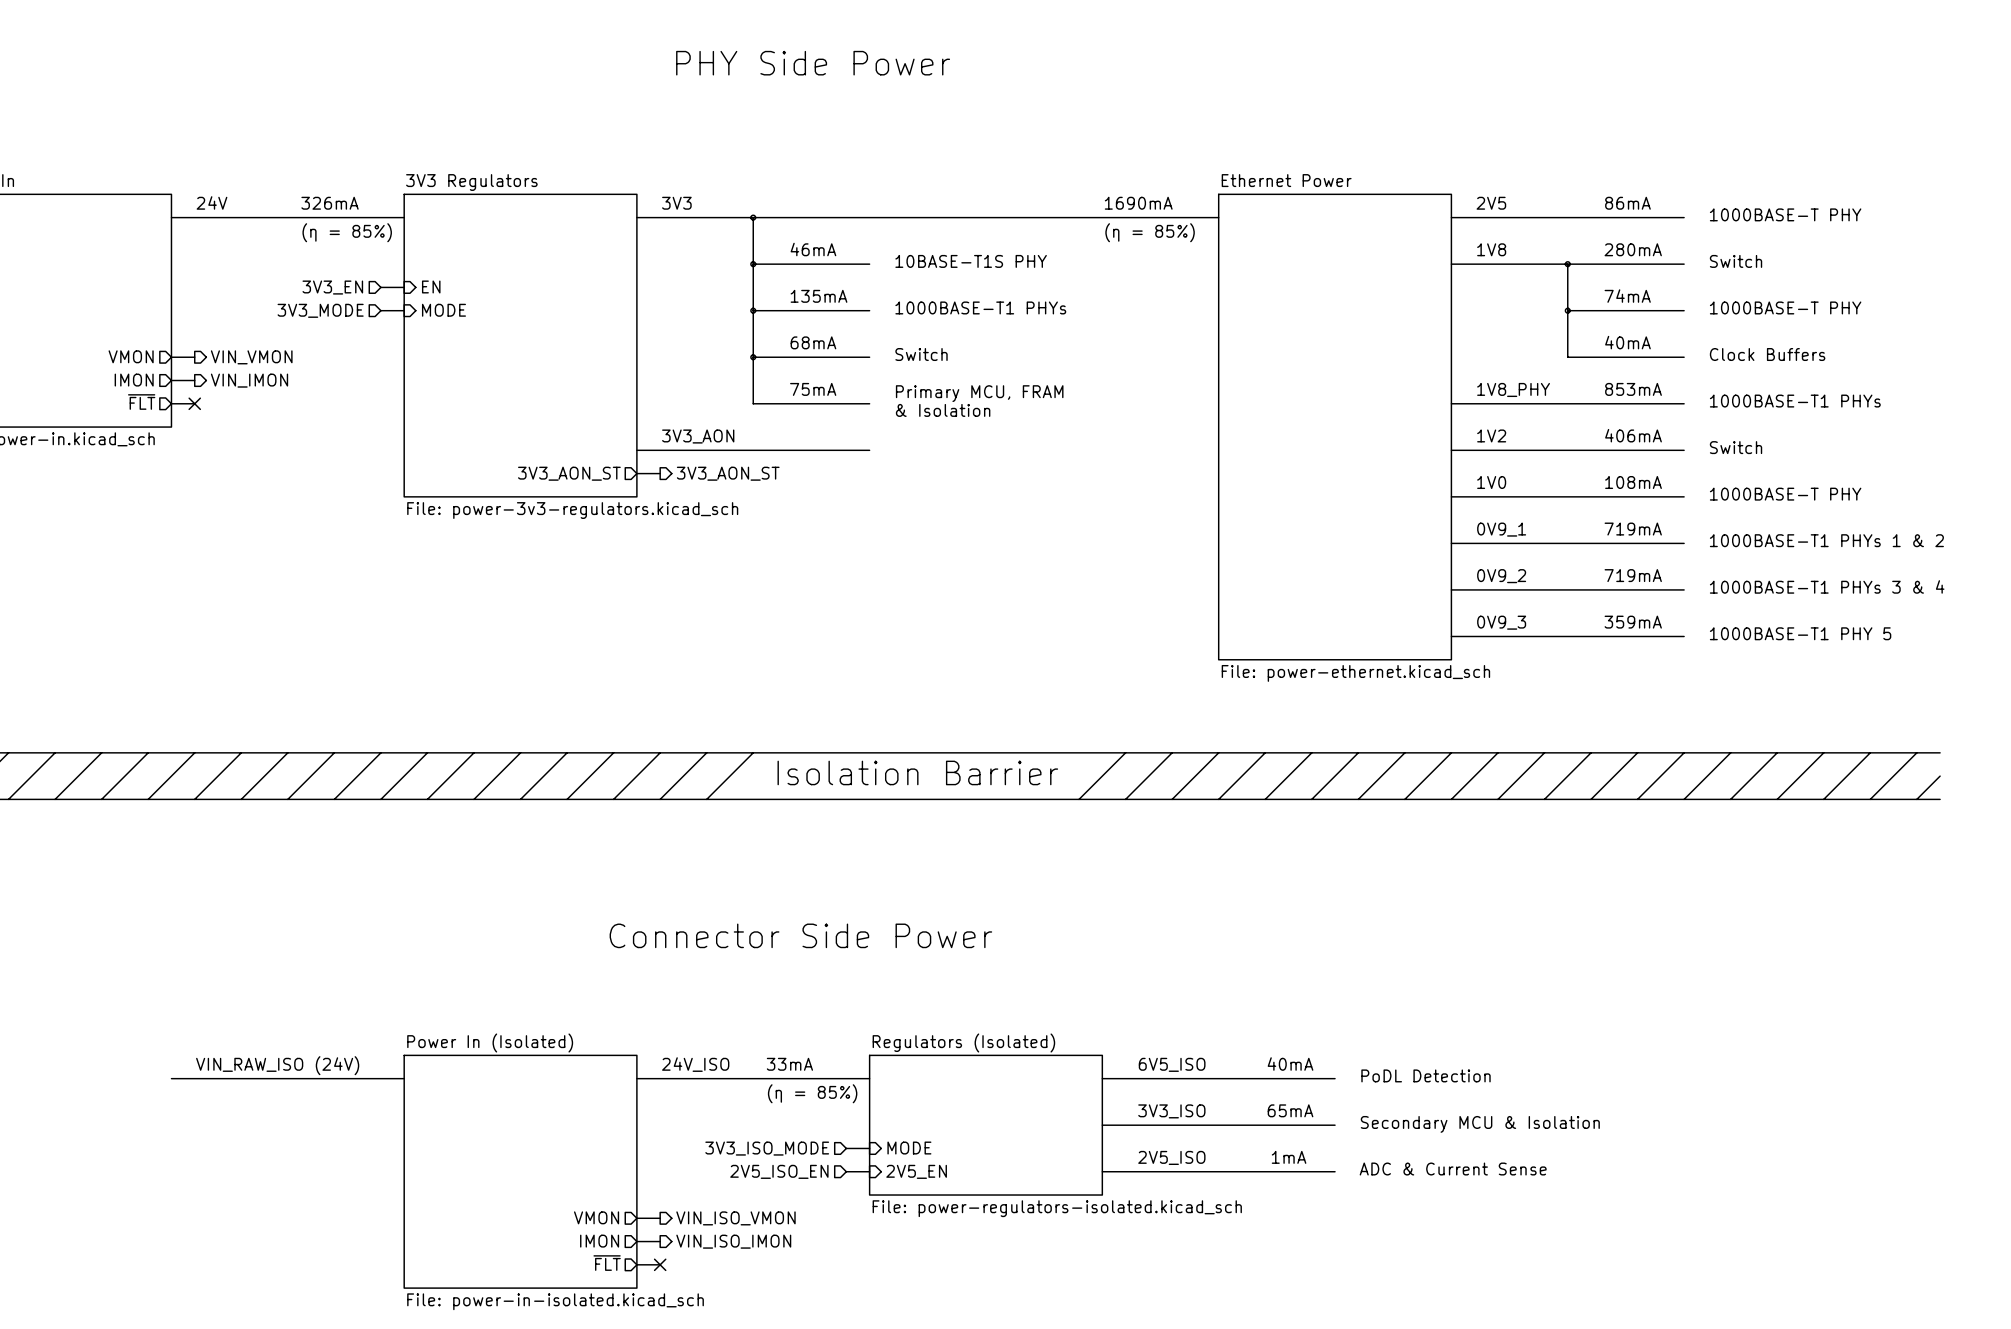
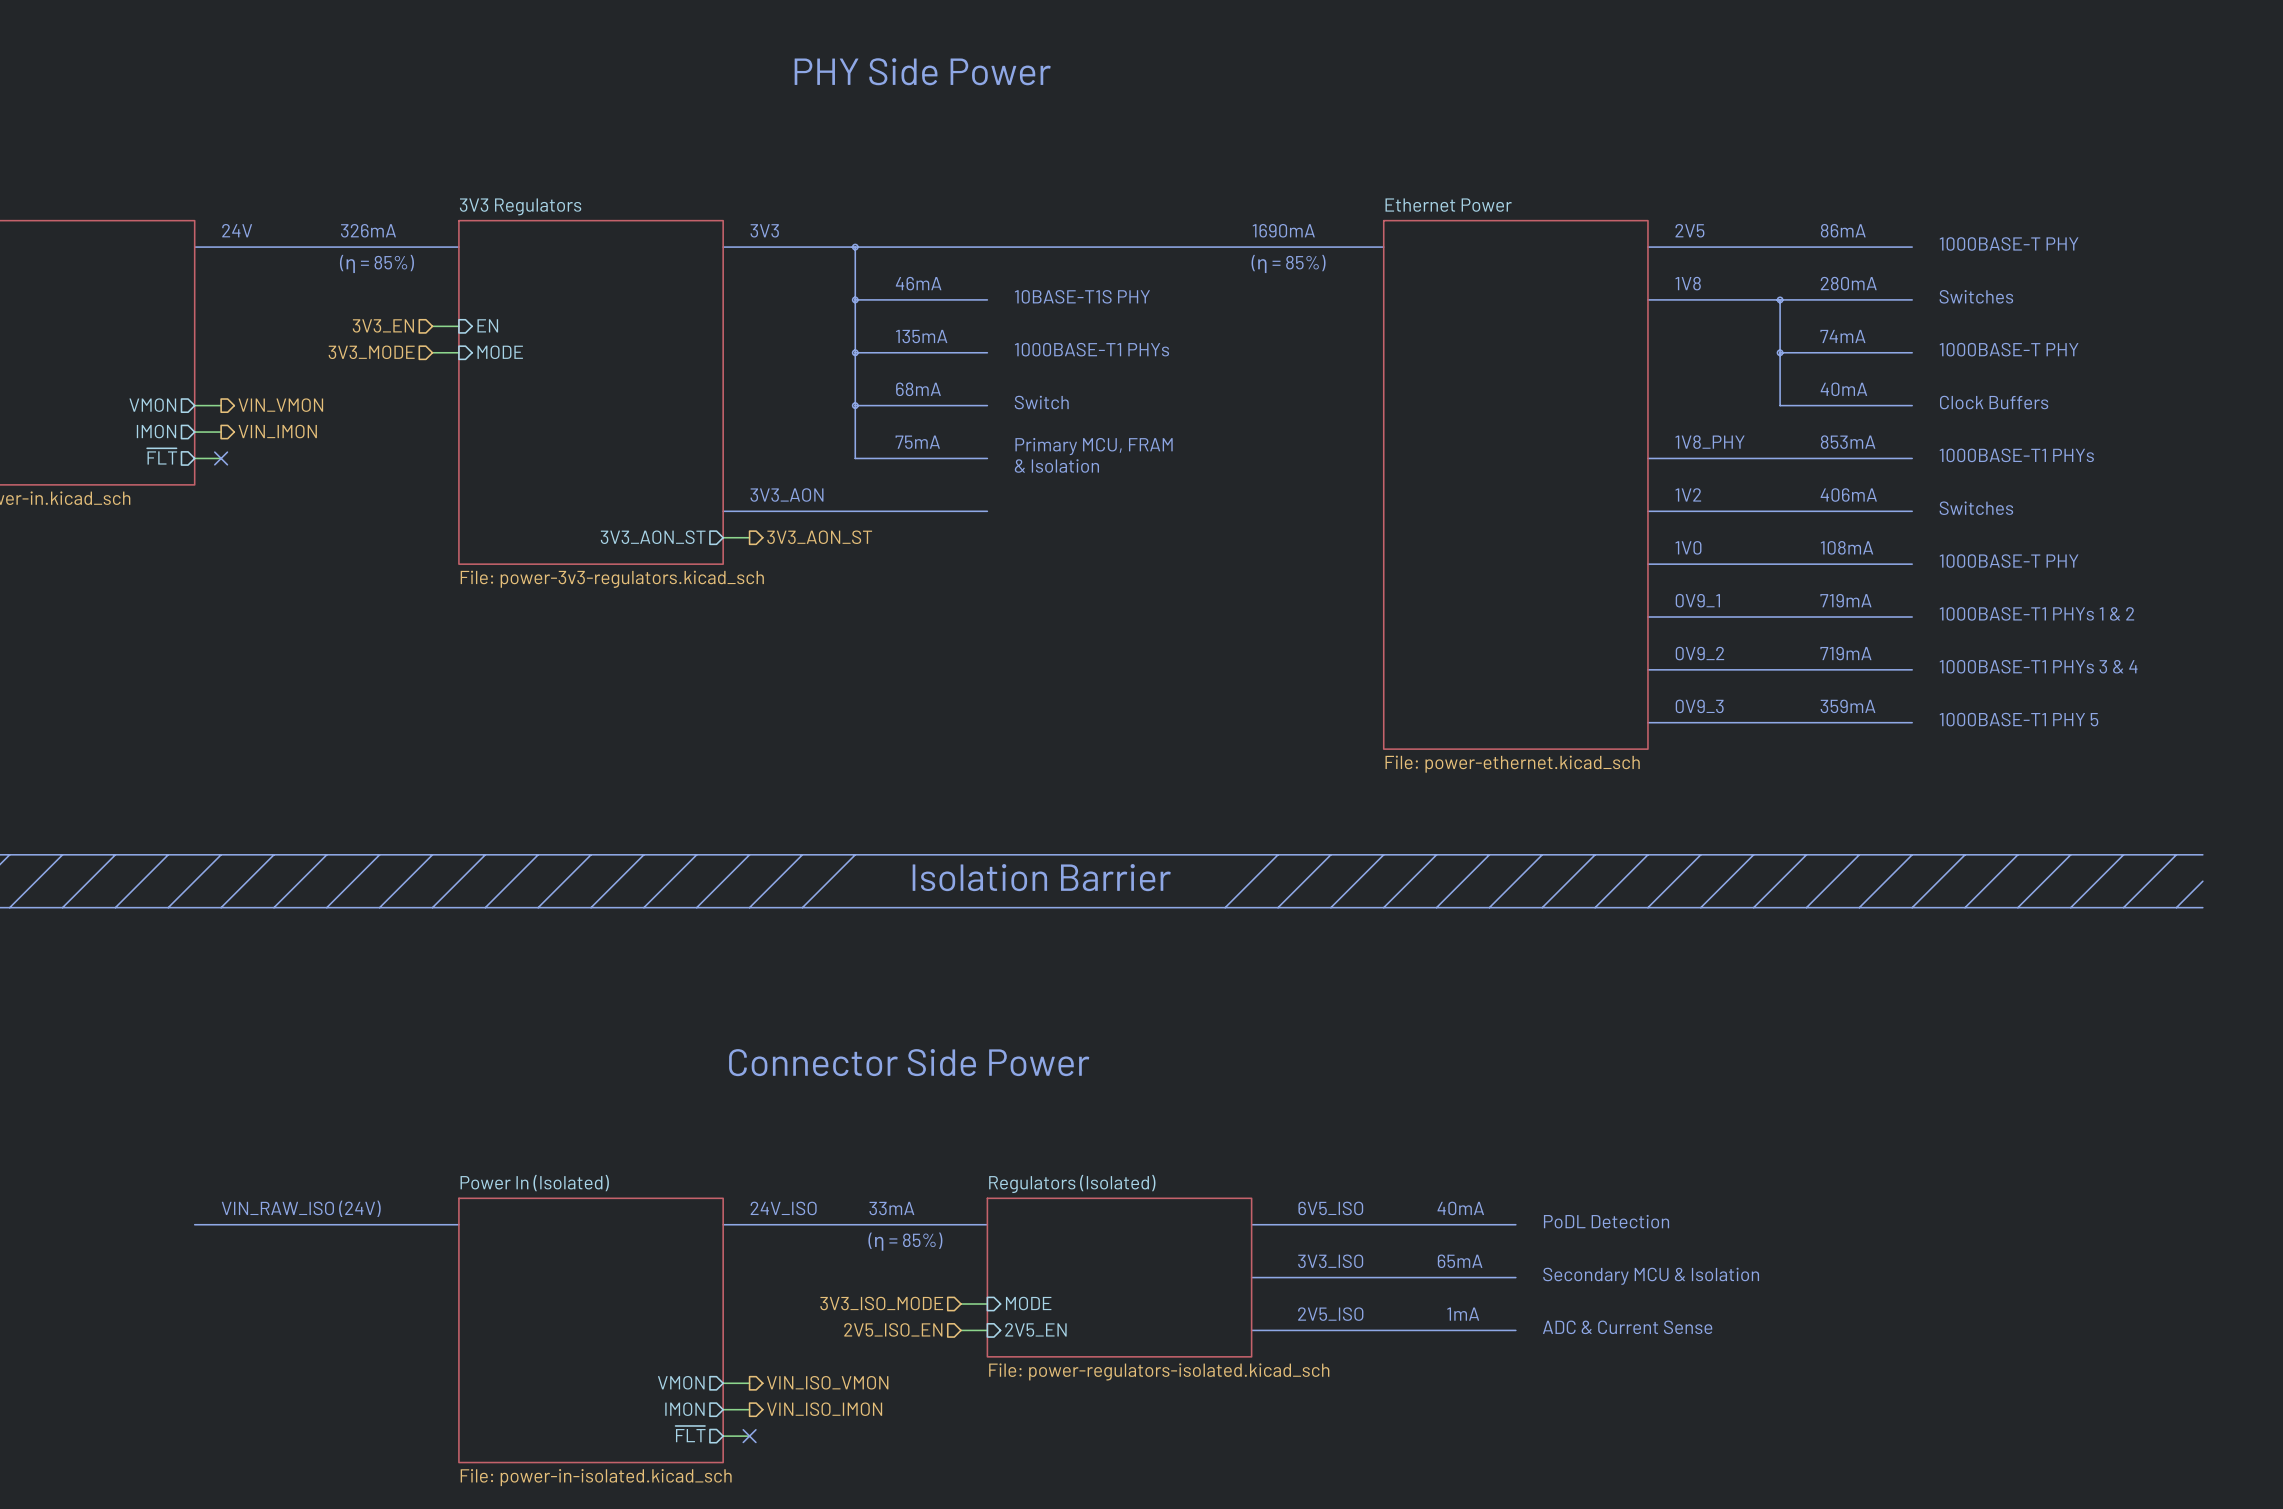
text: Switch (1736, 261) -> Switches (1976, 296)
text: Switch (1736, 447) -> Switches (1976, 508)

